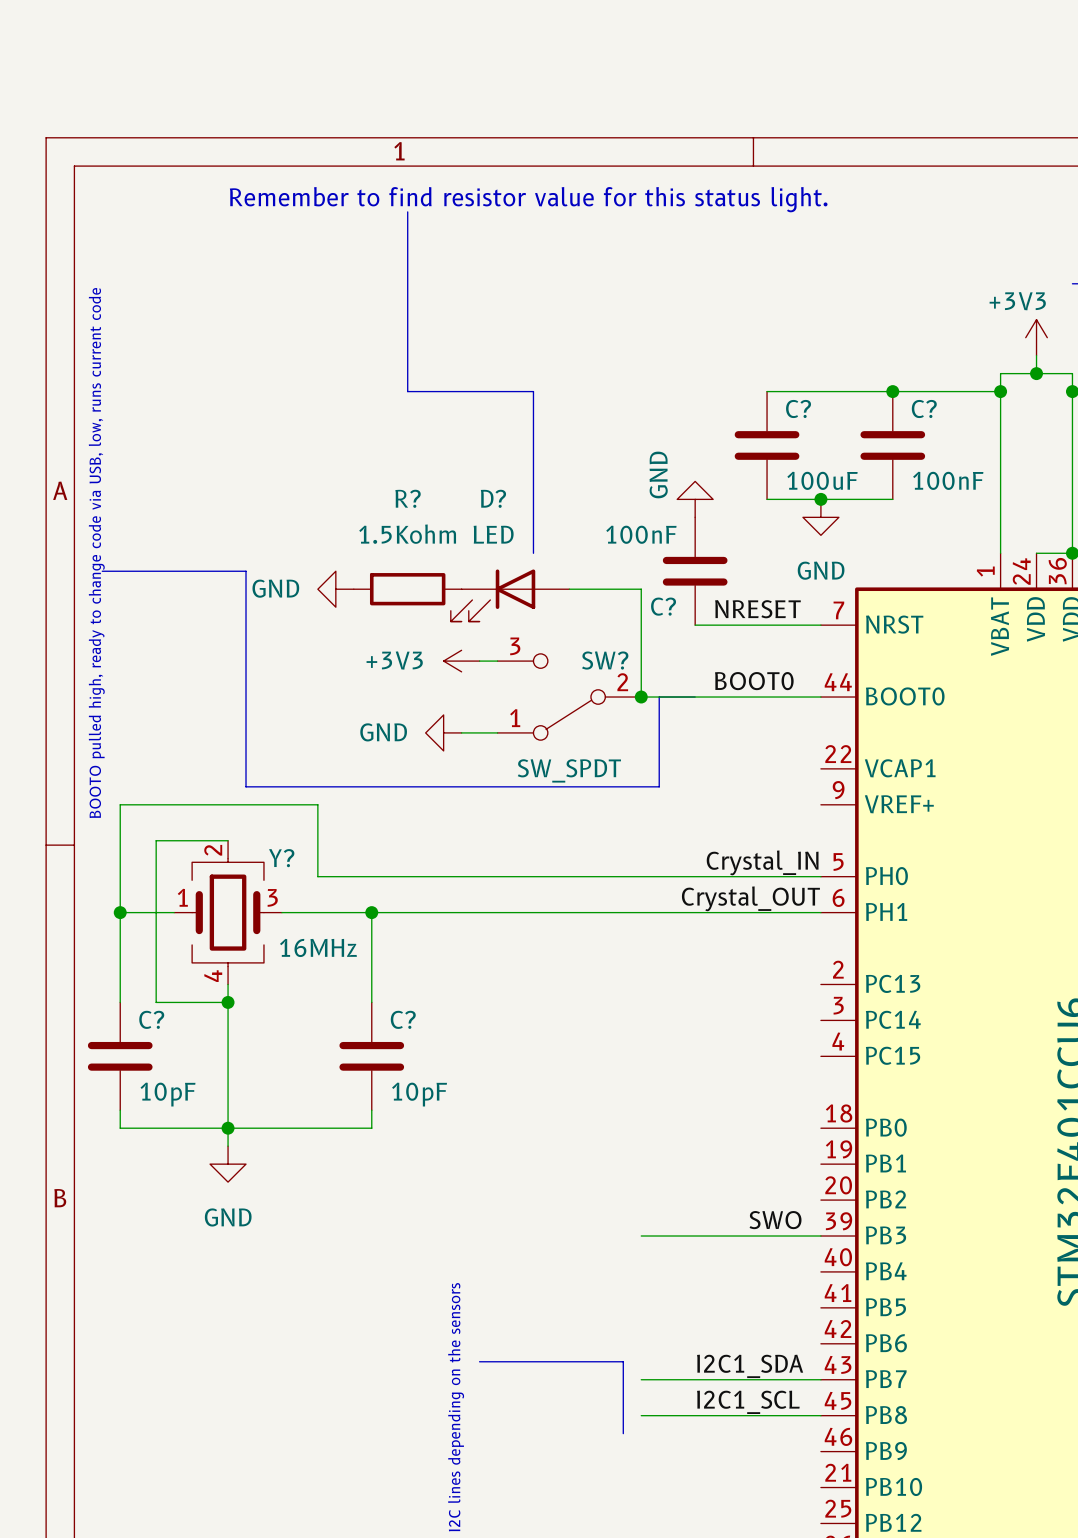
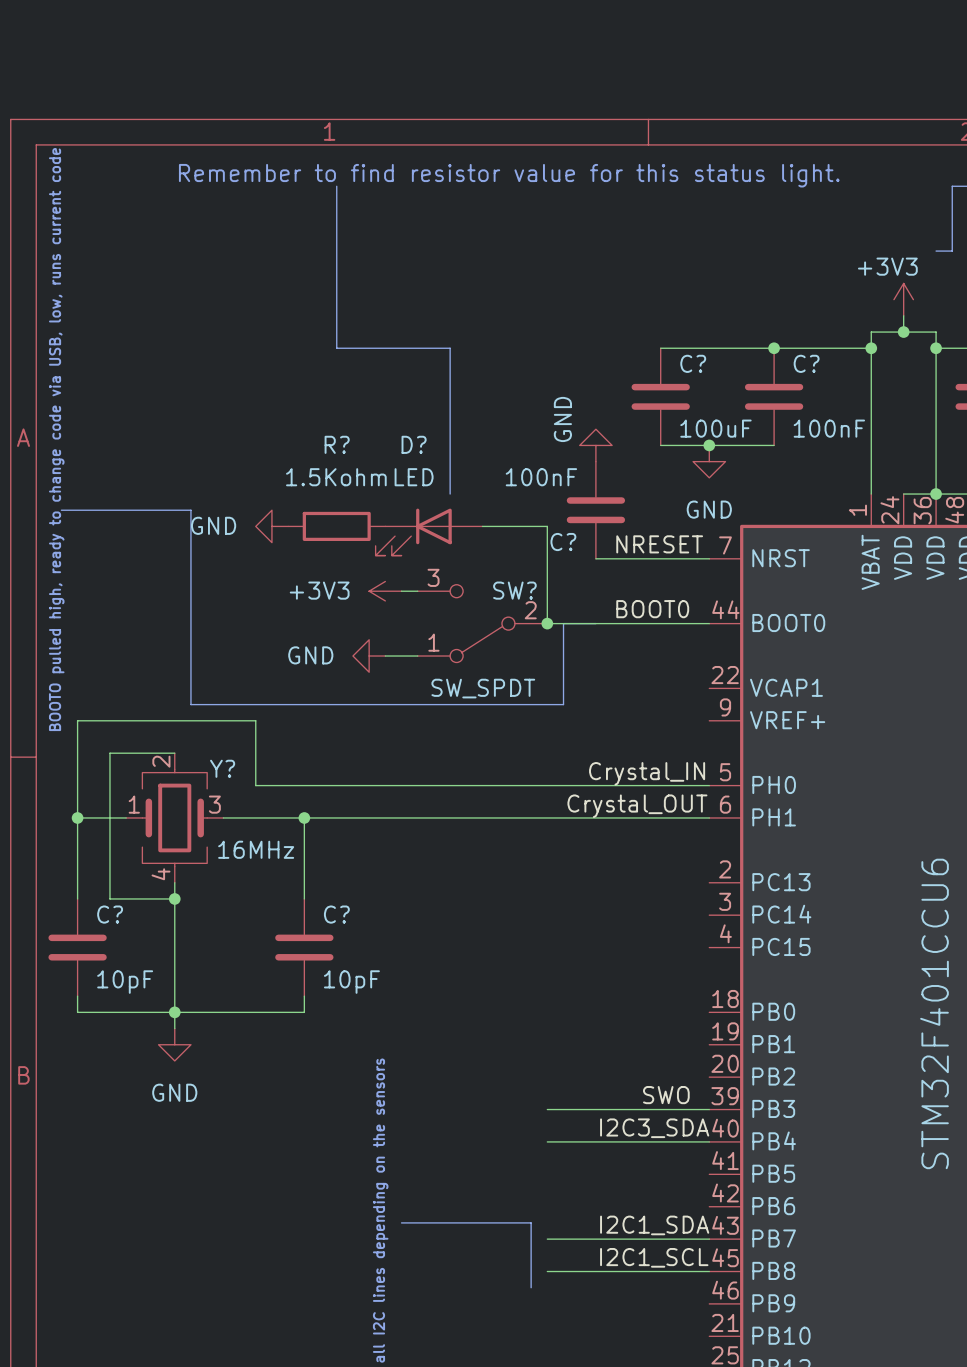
label: none -> I2C3_SDA (654, 1128)
wire: none -> (547, 1141) (709, 1141)

